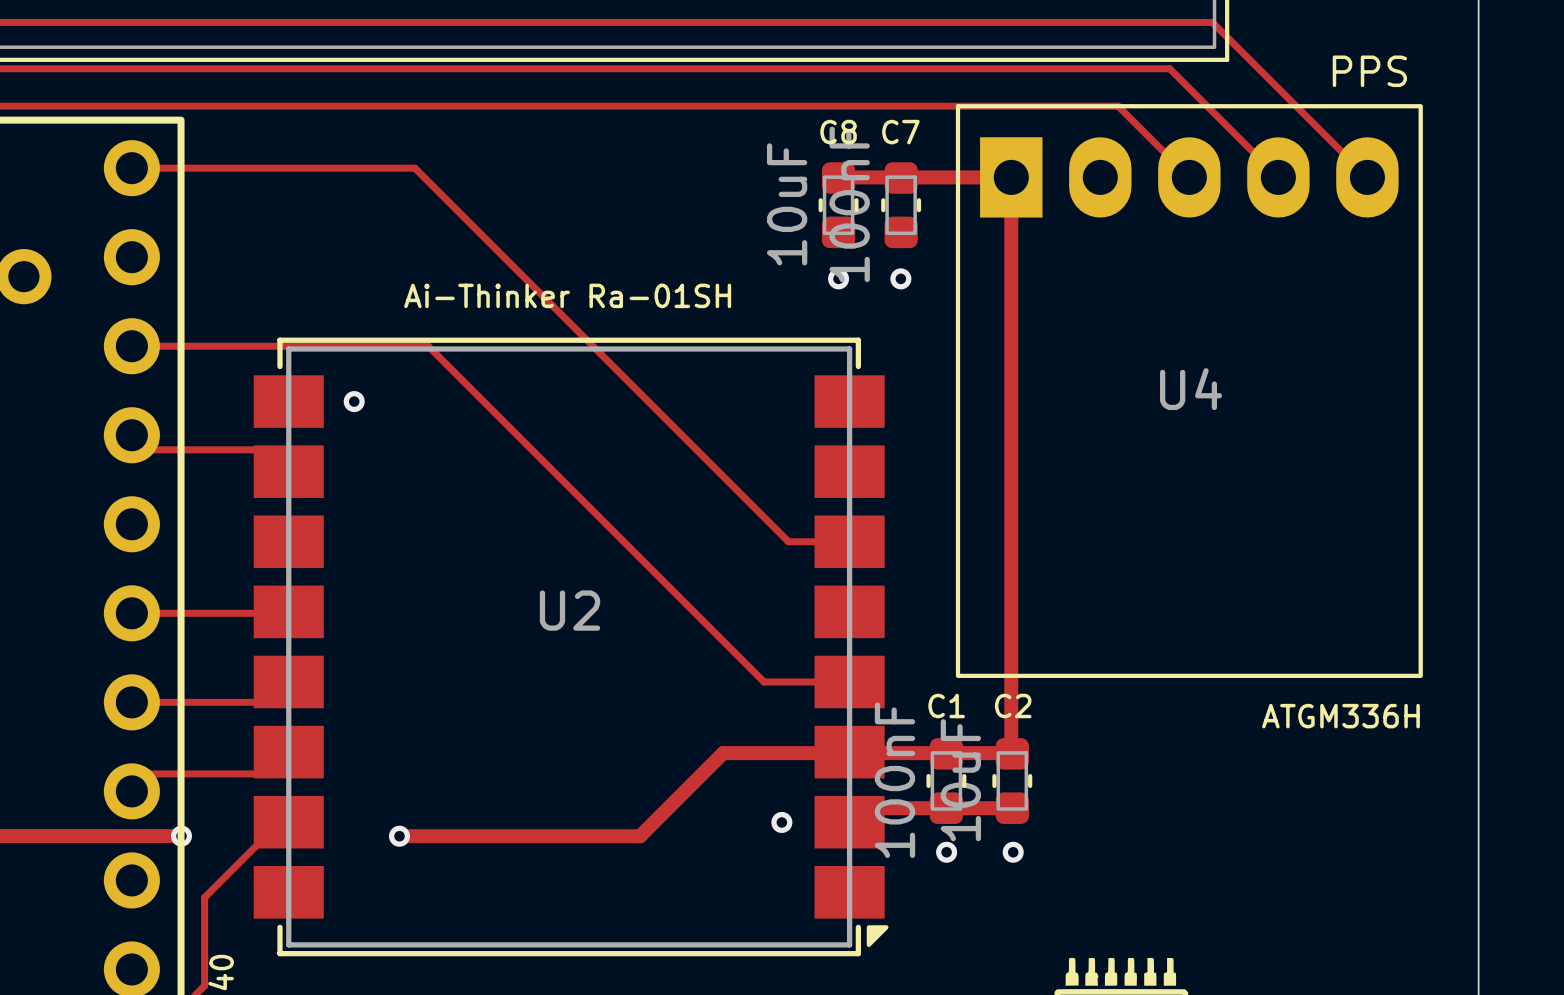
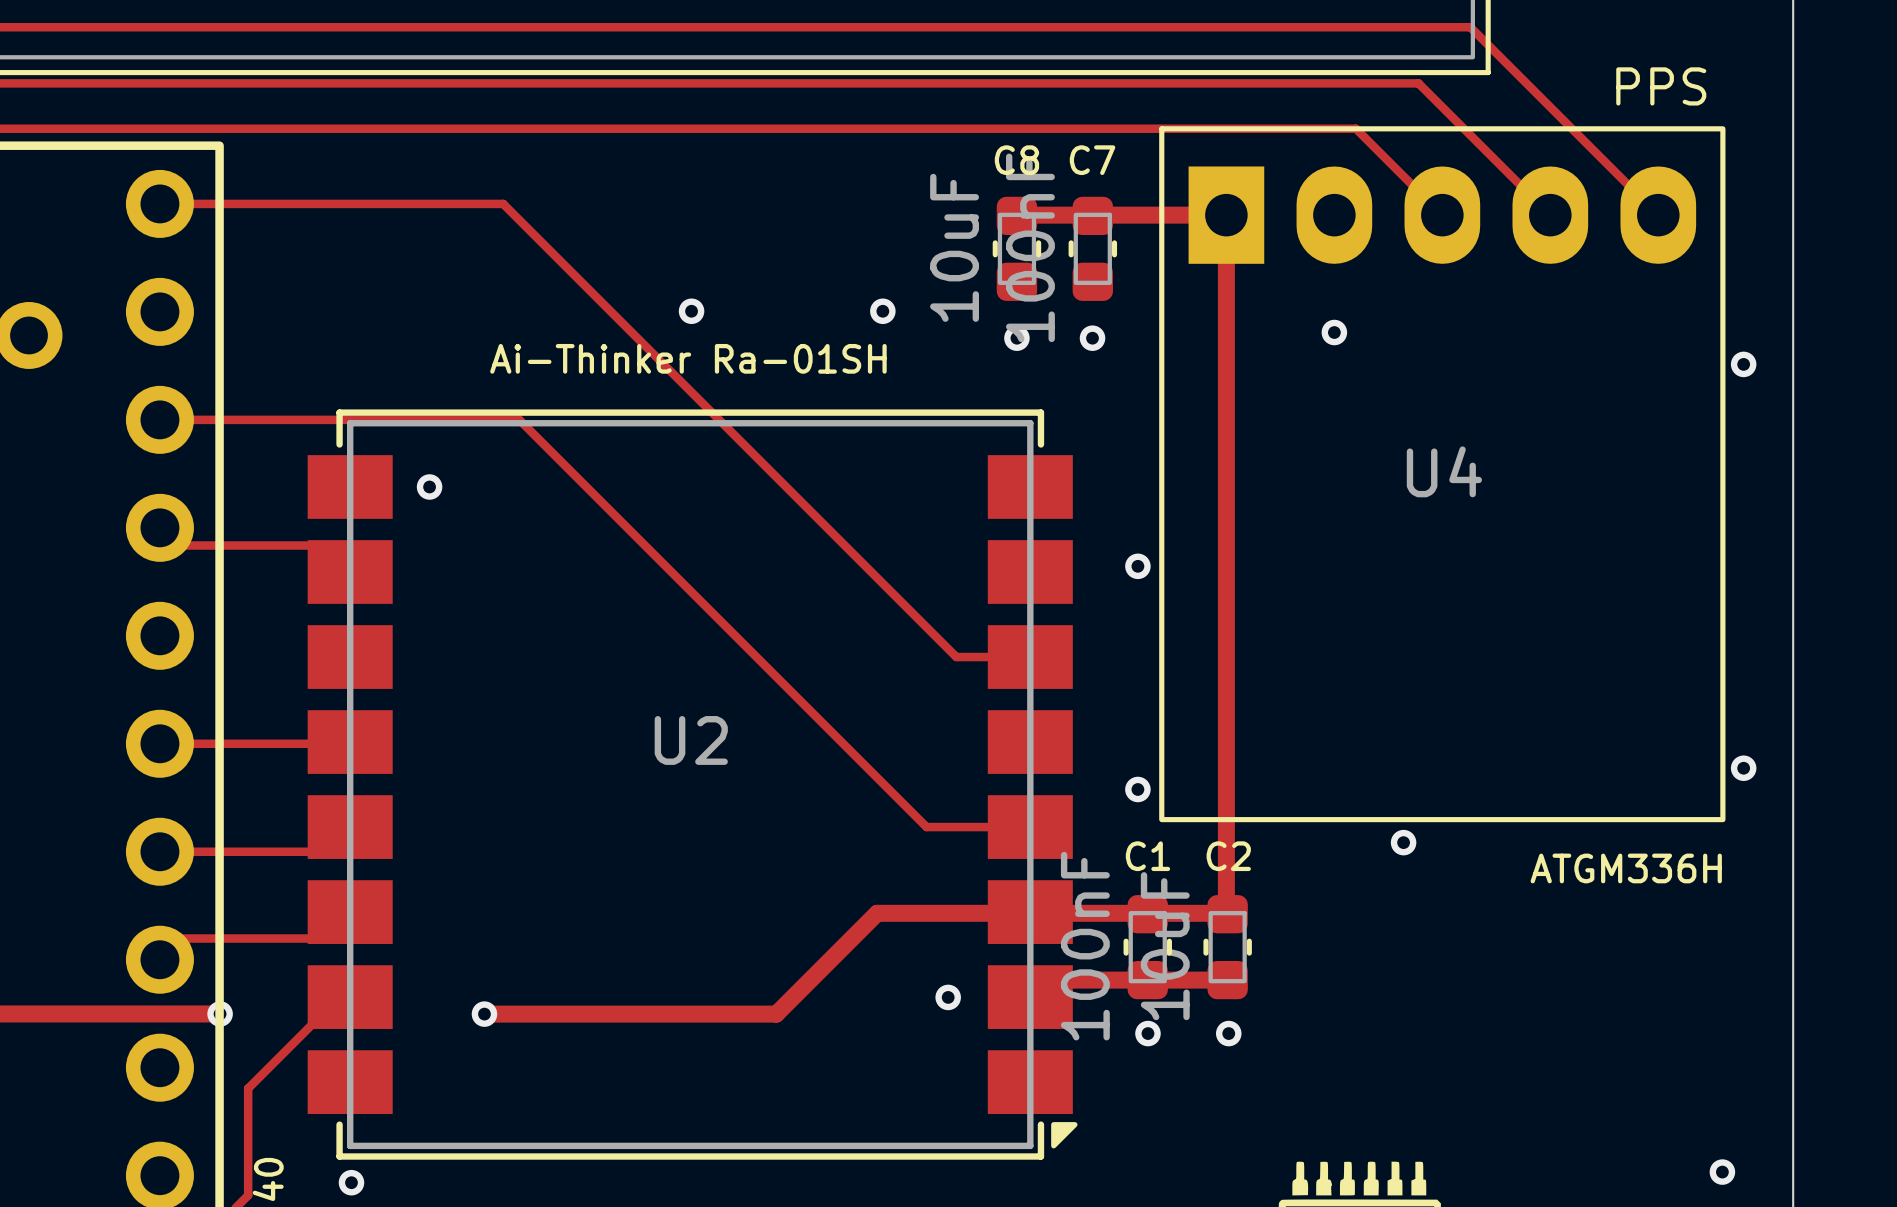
via: none -> (691, 311)
via: none -> (882, 311)
via: none -> (1334, 332)
via: none -> (1743, 364)
via: none -> (1137, 566)
via: none -> (1743, 768)
via: none -> (1137, 789)
via: none -> (1403, 842)
via: none -> (1722, 1172)
via: none -> (351, 1182)

